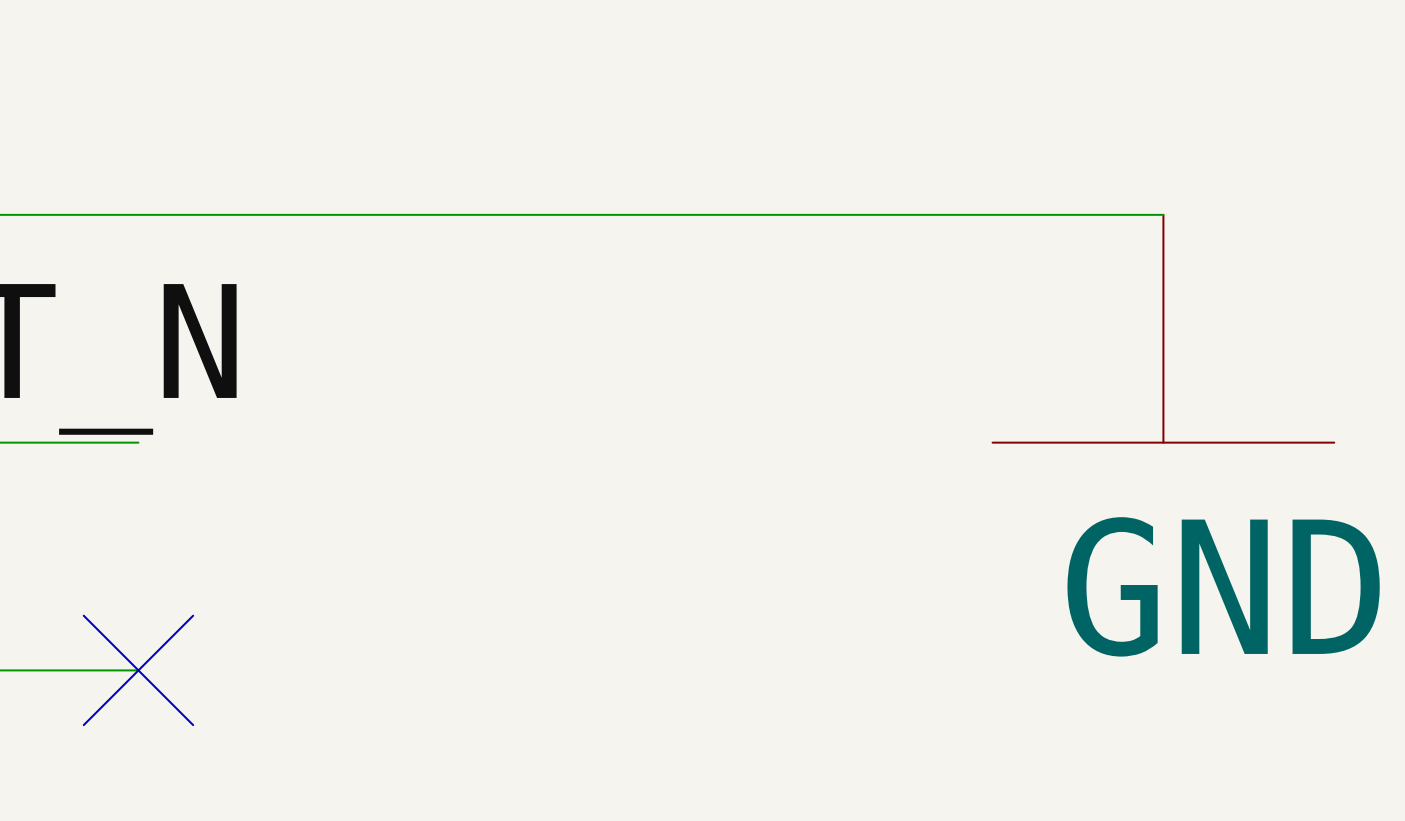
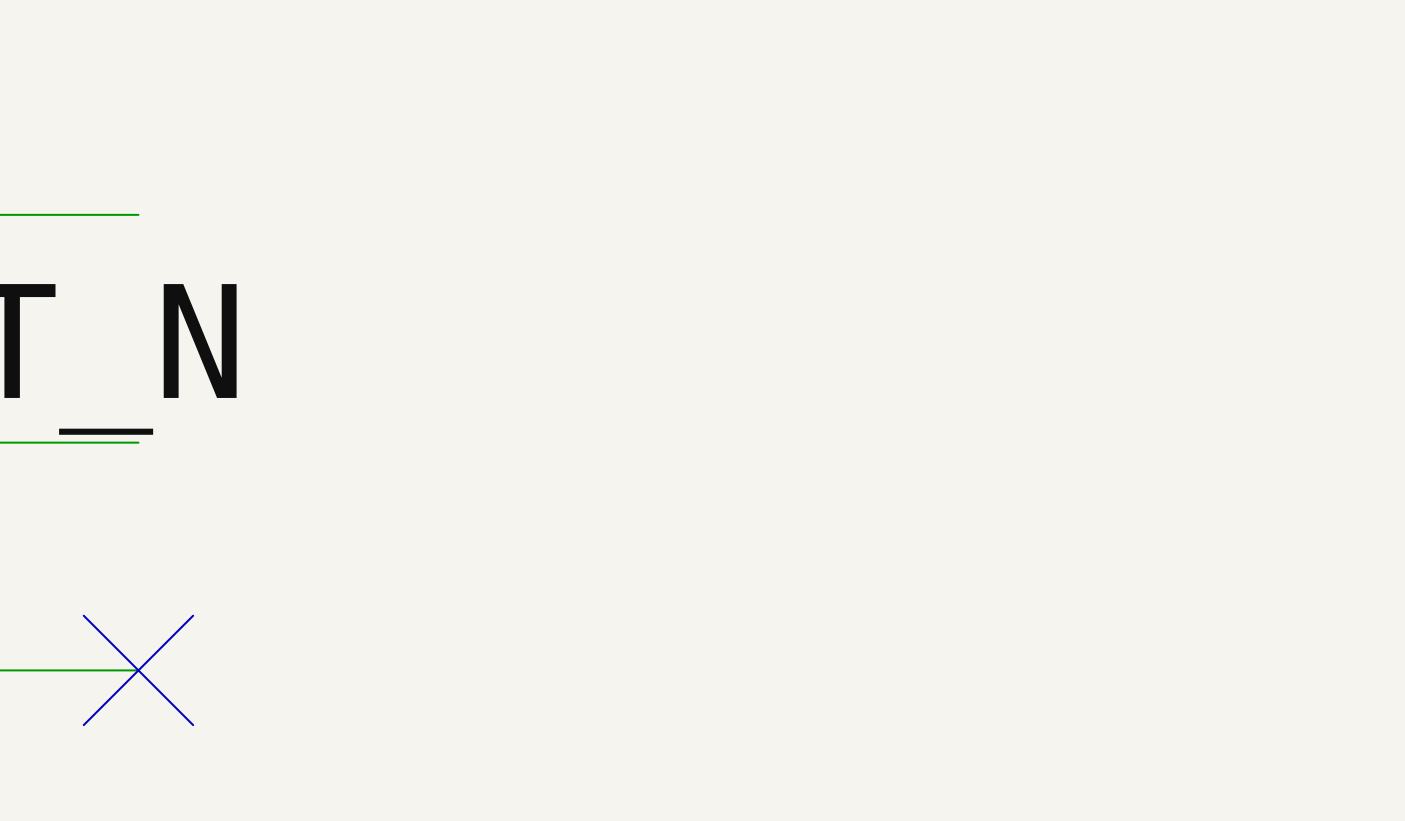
wire: (138, 214) (1163, 214) -> none
power symbol: GND (1163, 328) -> none

